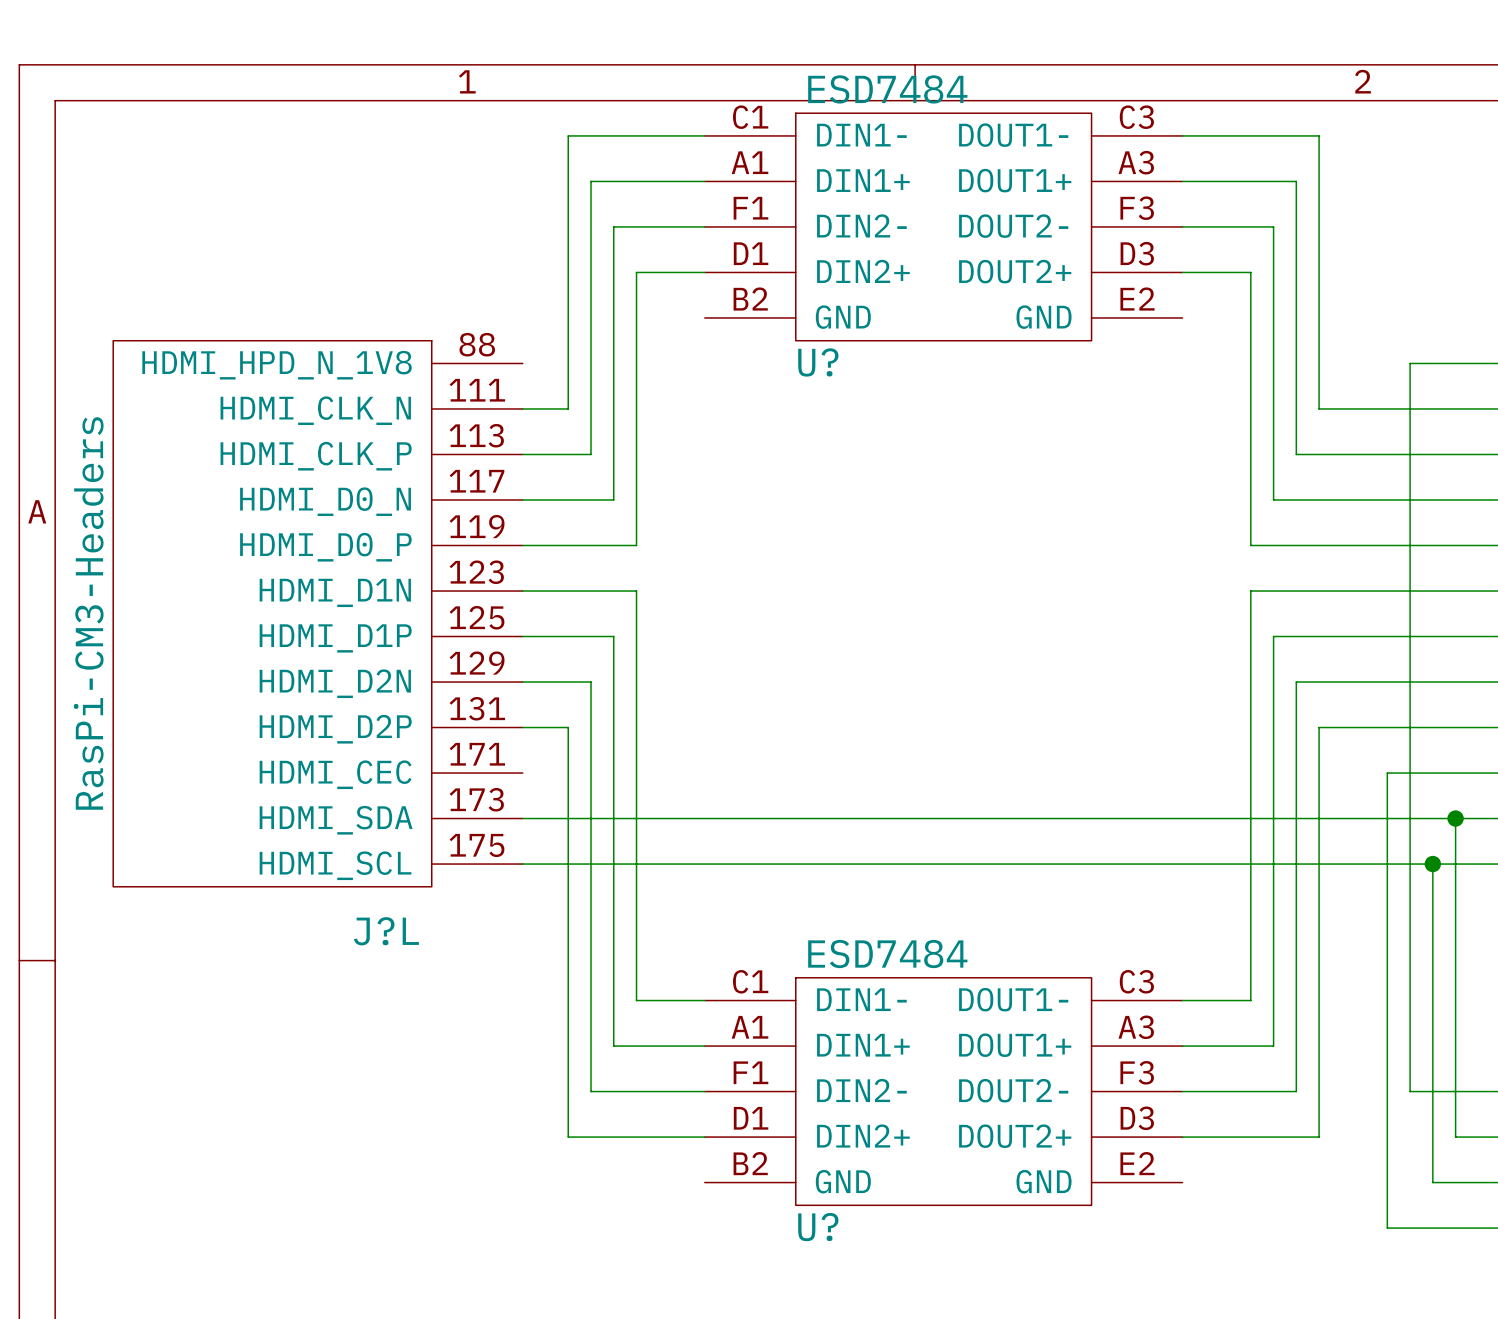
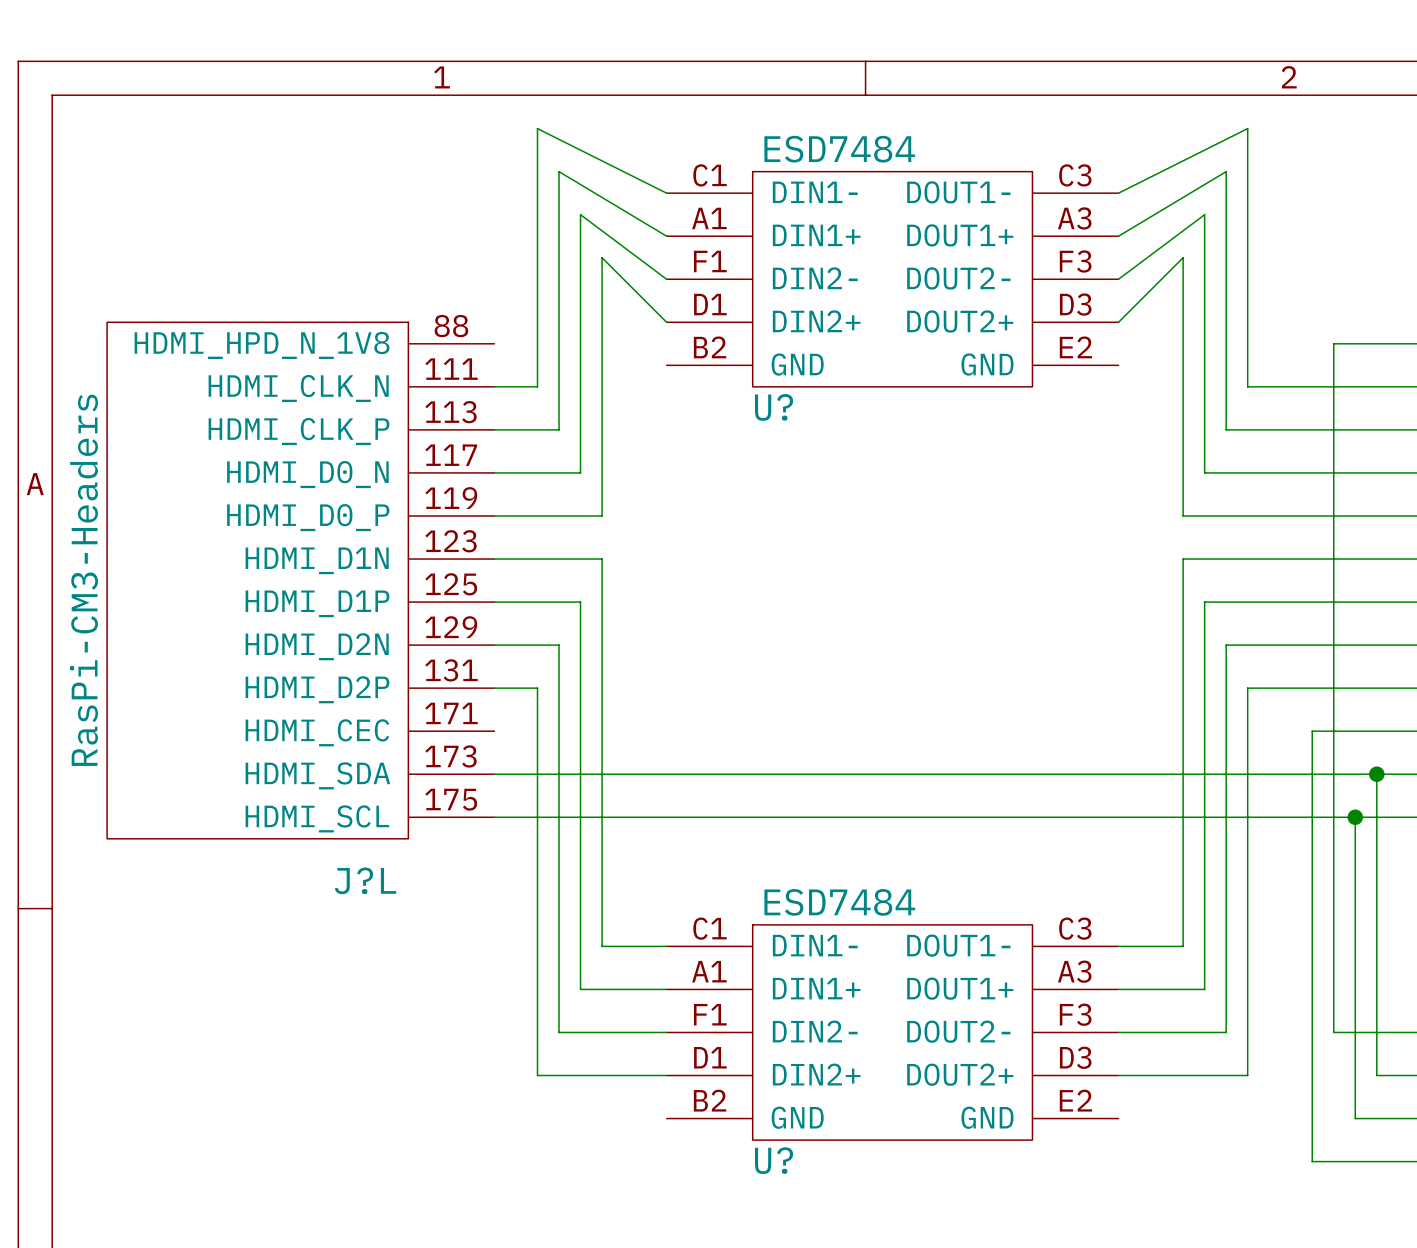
wire: (568, 135) (704, 135) -> (537, 128) (666, 193)
wire: (1182, 135) (1319, 135) -> (1118, 193) (1247, 128)
wire: (591, 181) (704, 181) -> (559, 171) (666, 236)
wire: (1182, 181) (1296, 181) -> (1118, 236) (1226, 171)
wire: (613, 226) (704, 226) -> (580, 214) (666, 279)
U? position: (943, 226) -> (892, 279)
wire: (1182, 226) (1273, 226) -> (1118, 279) (1204, 214)
wire: (636, 272) (704, 272) -> (602, 257) (666, 322)
wire: (1182, 272) (1250, 272) -> (1118, 322) (1183, 257)

